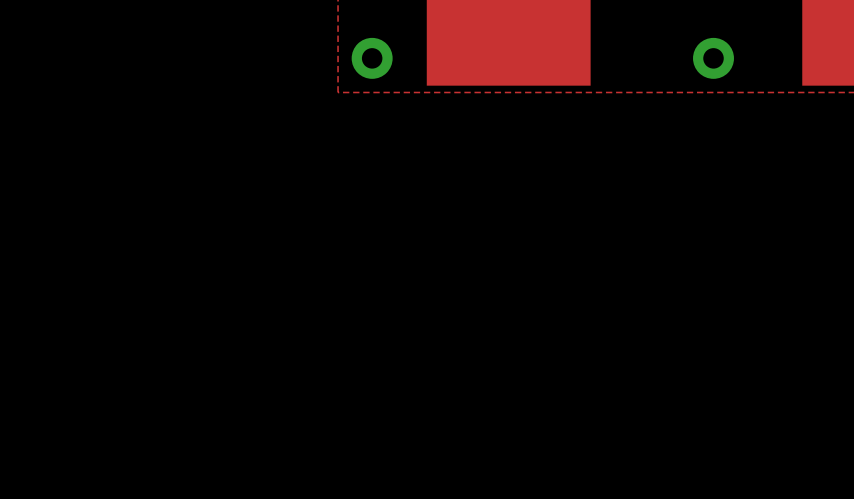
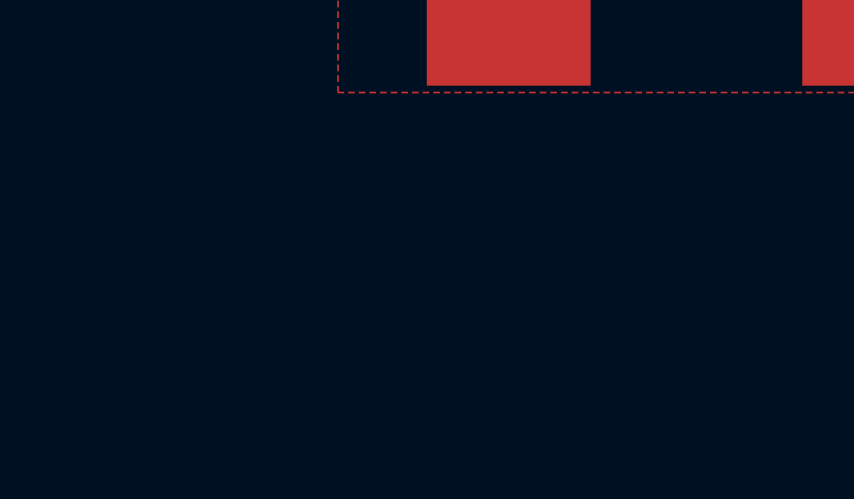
via: (372, 58) -> none
via: (713, 58) -> none

